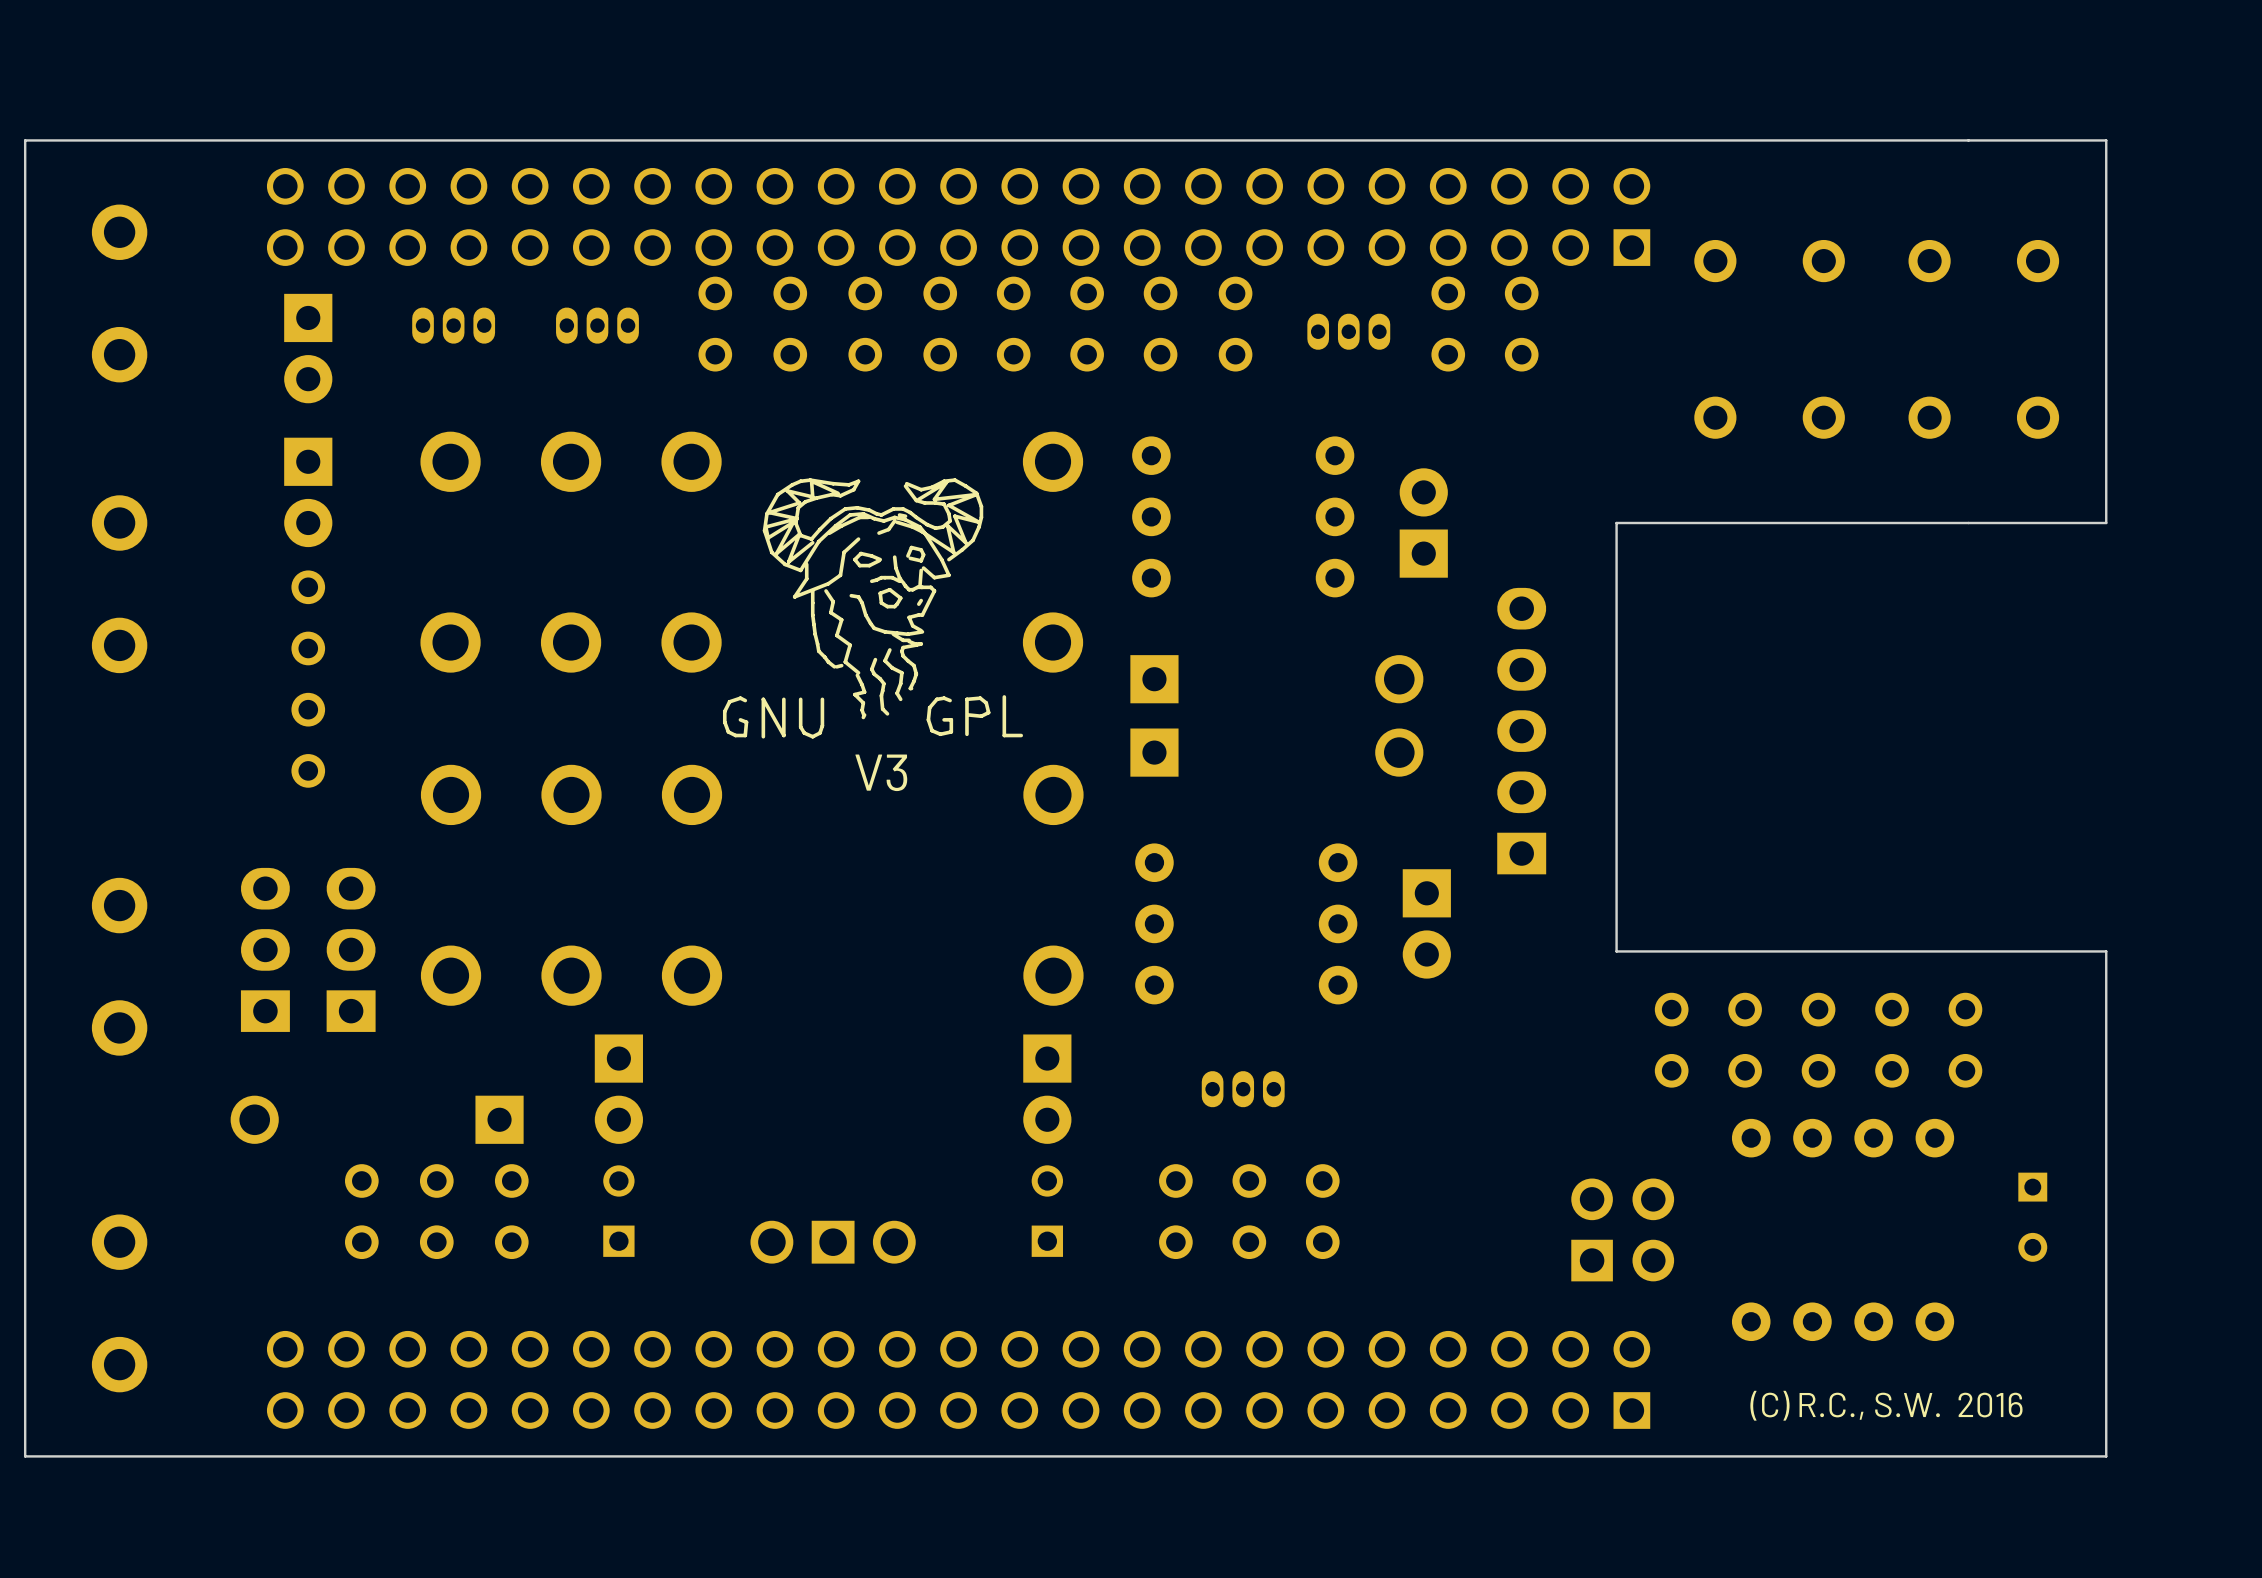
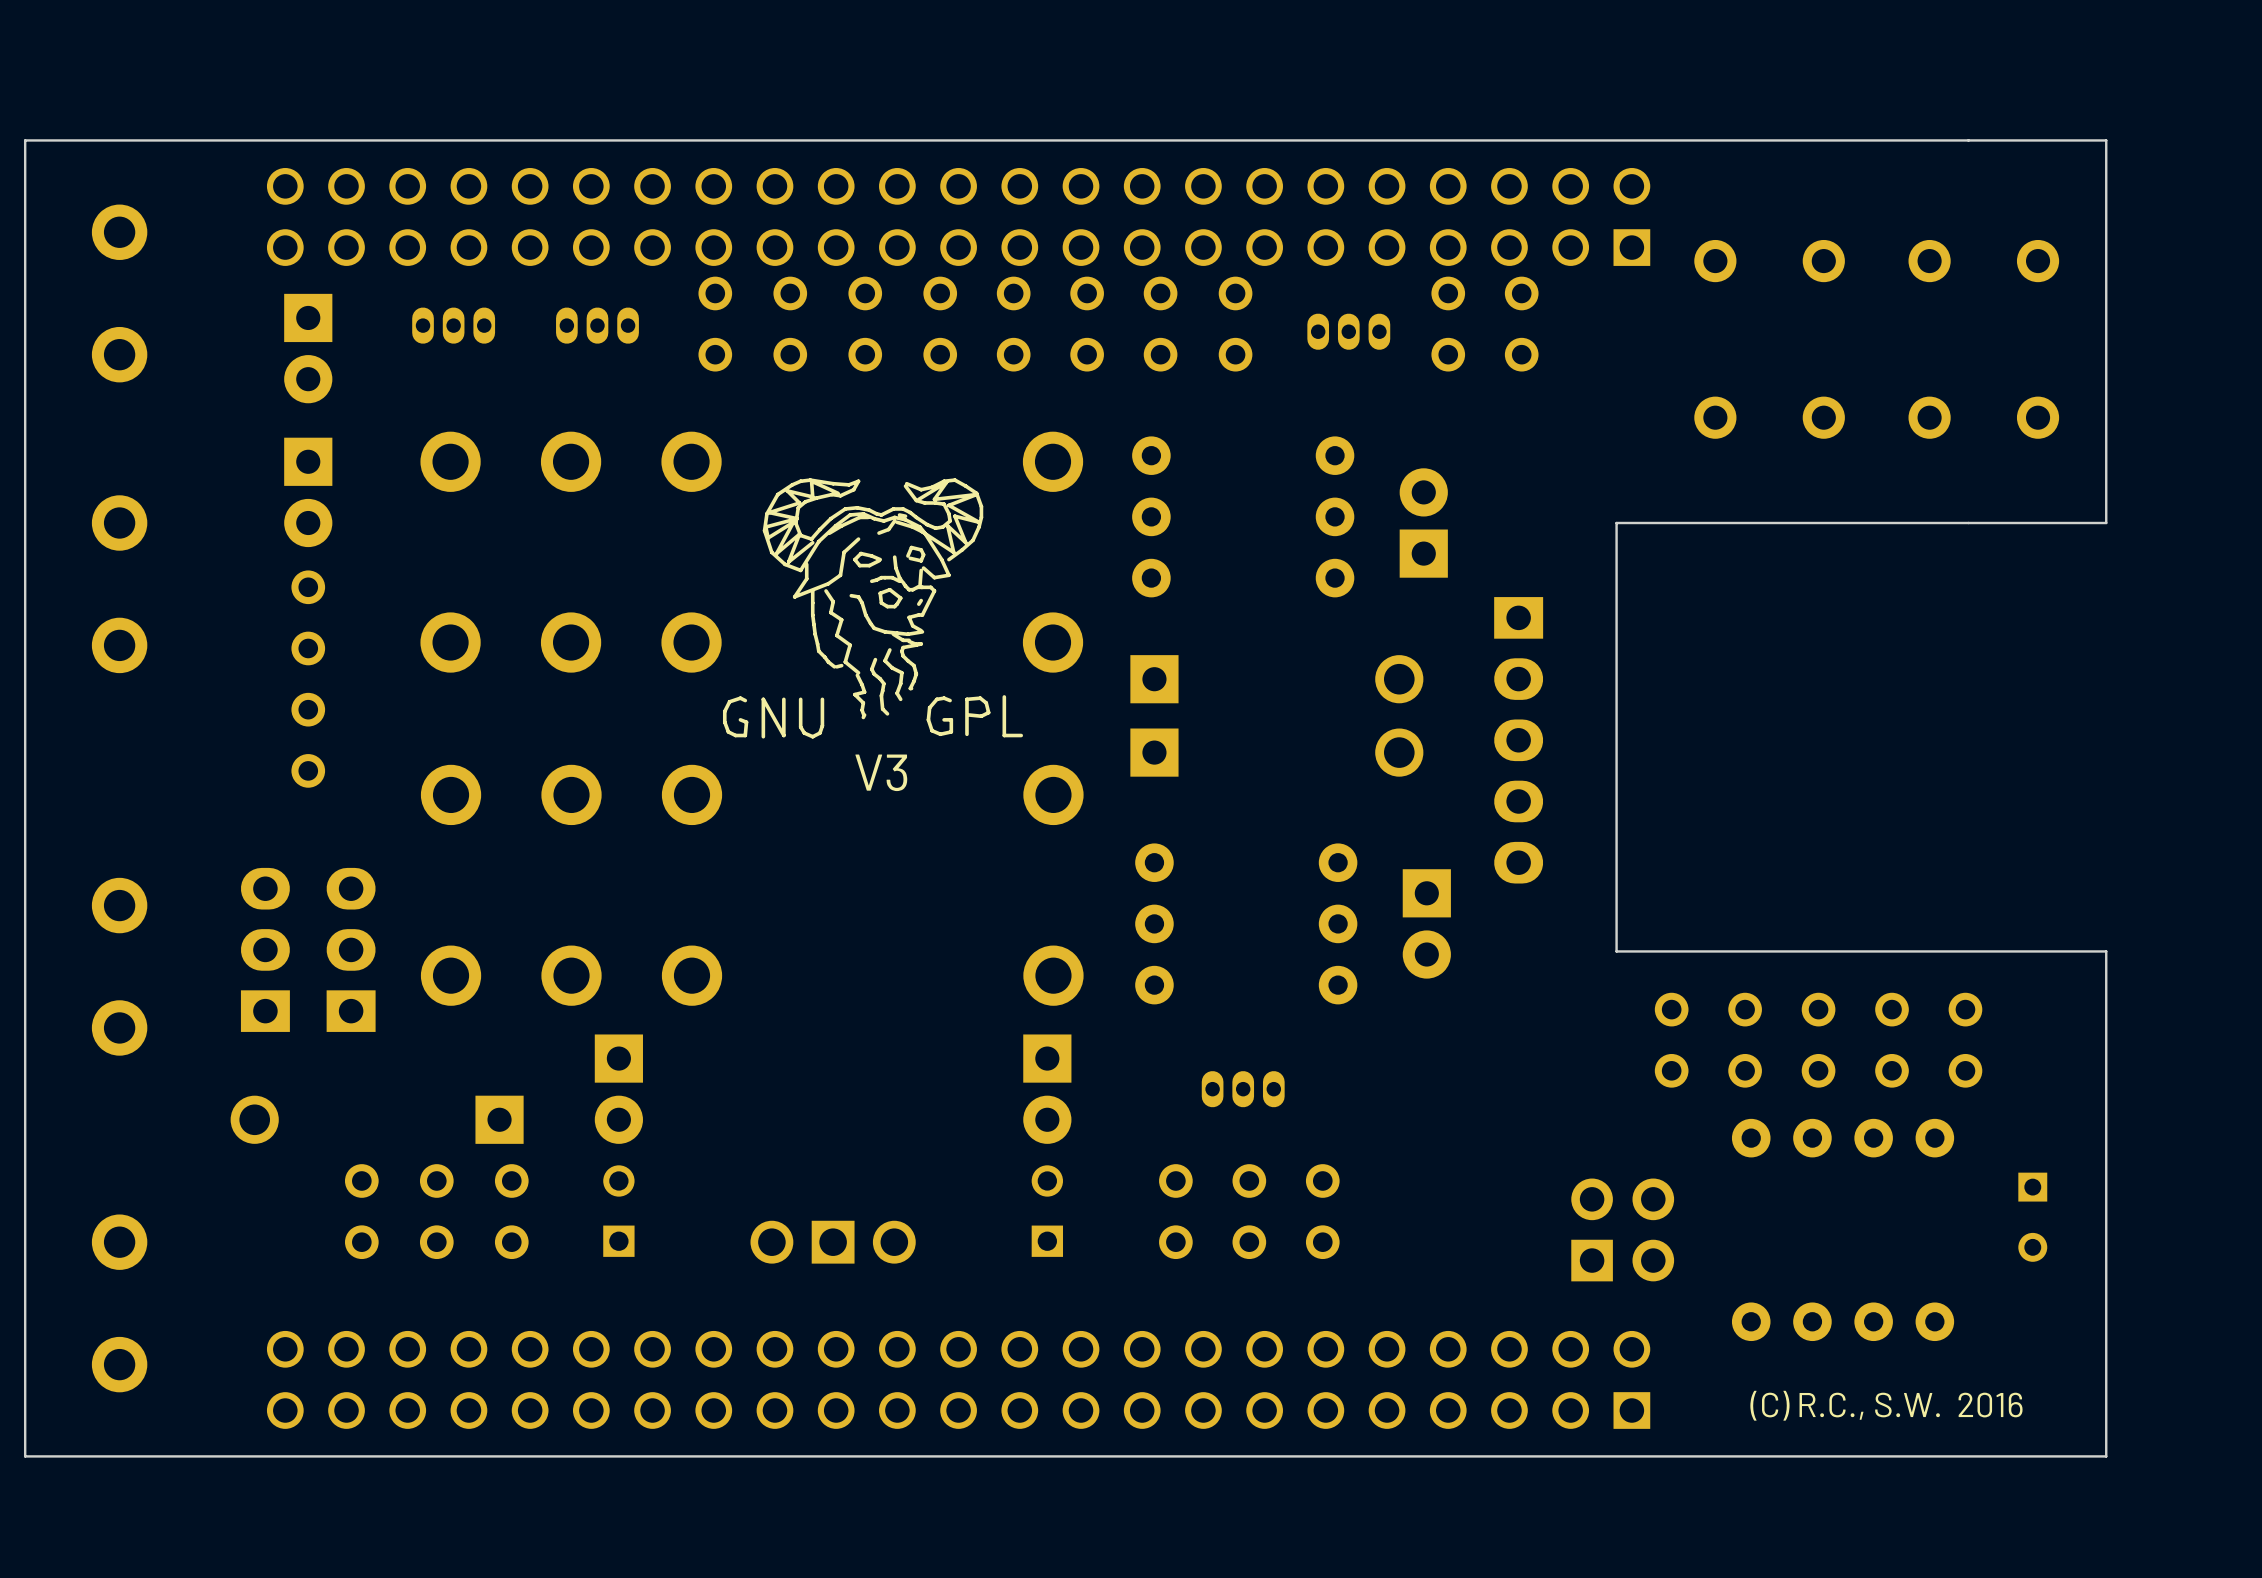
part rotation: 0° (1521, 731) -> 180° (1518, 740)

